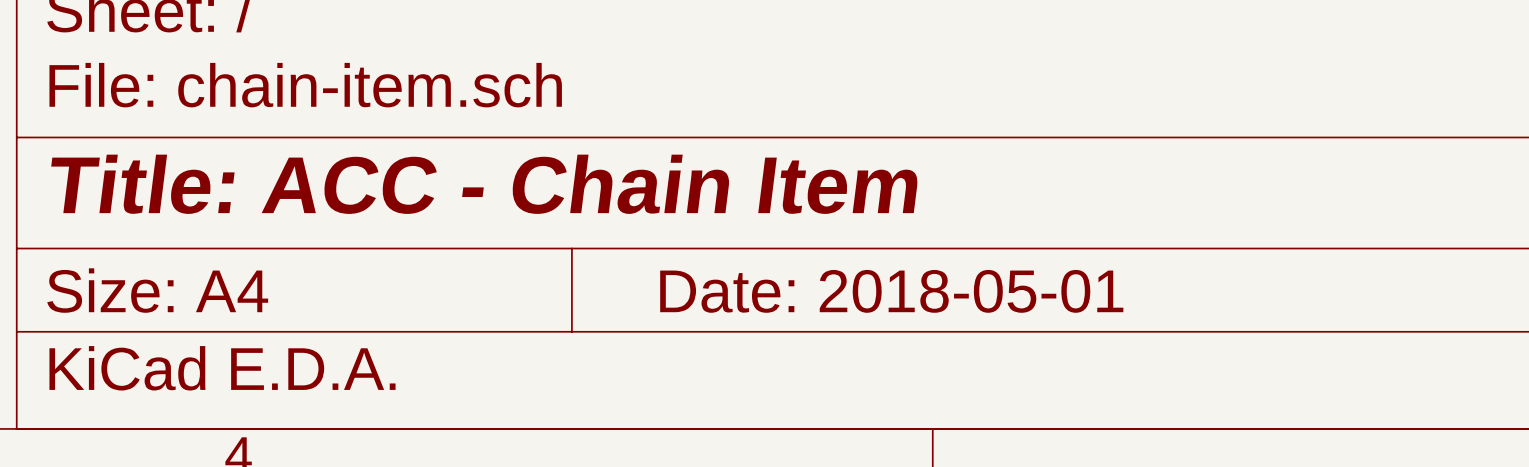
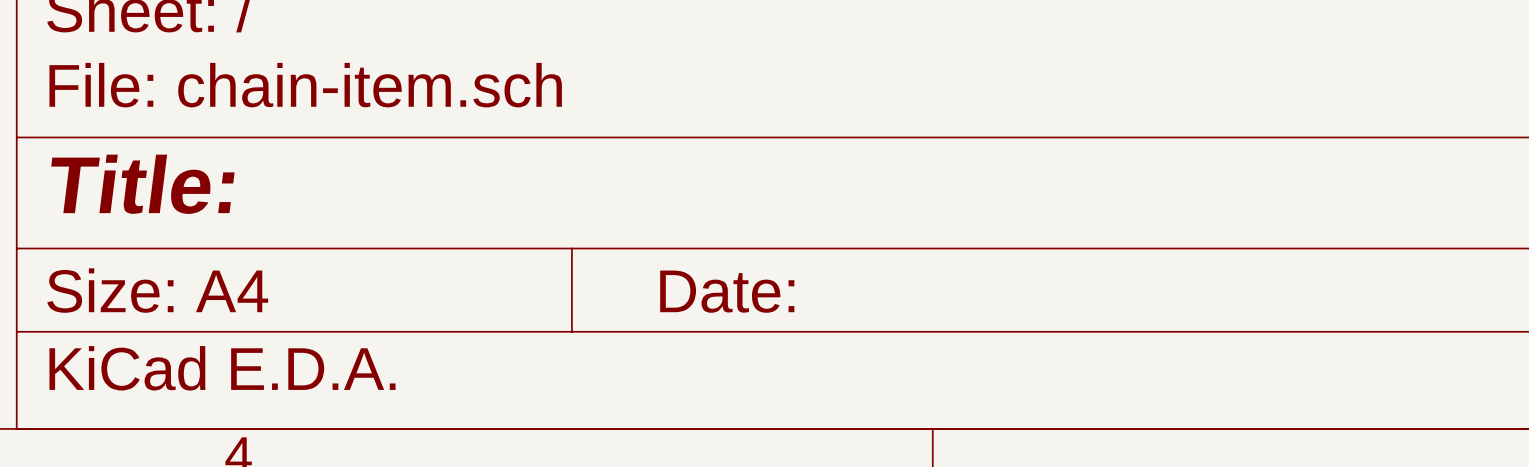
title block: Title: ACC - Chain Item (484, 184) -> Title: (142, 184)
title block: Date: 2018-05-01 (891, 291) -> Date: (727, 291)

